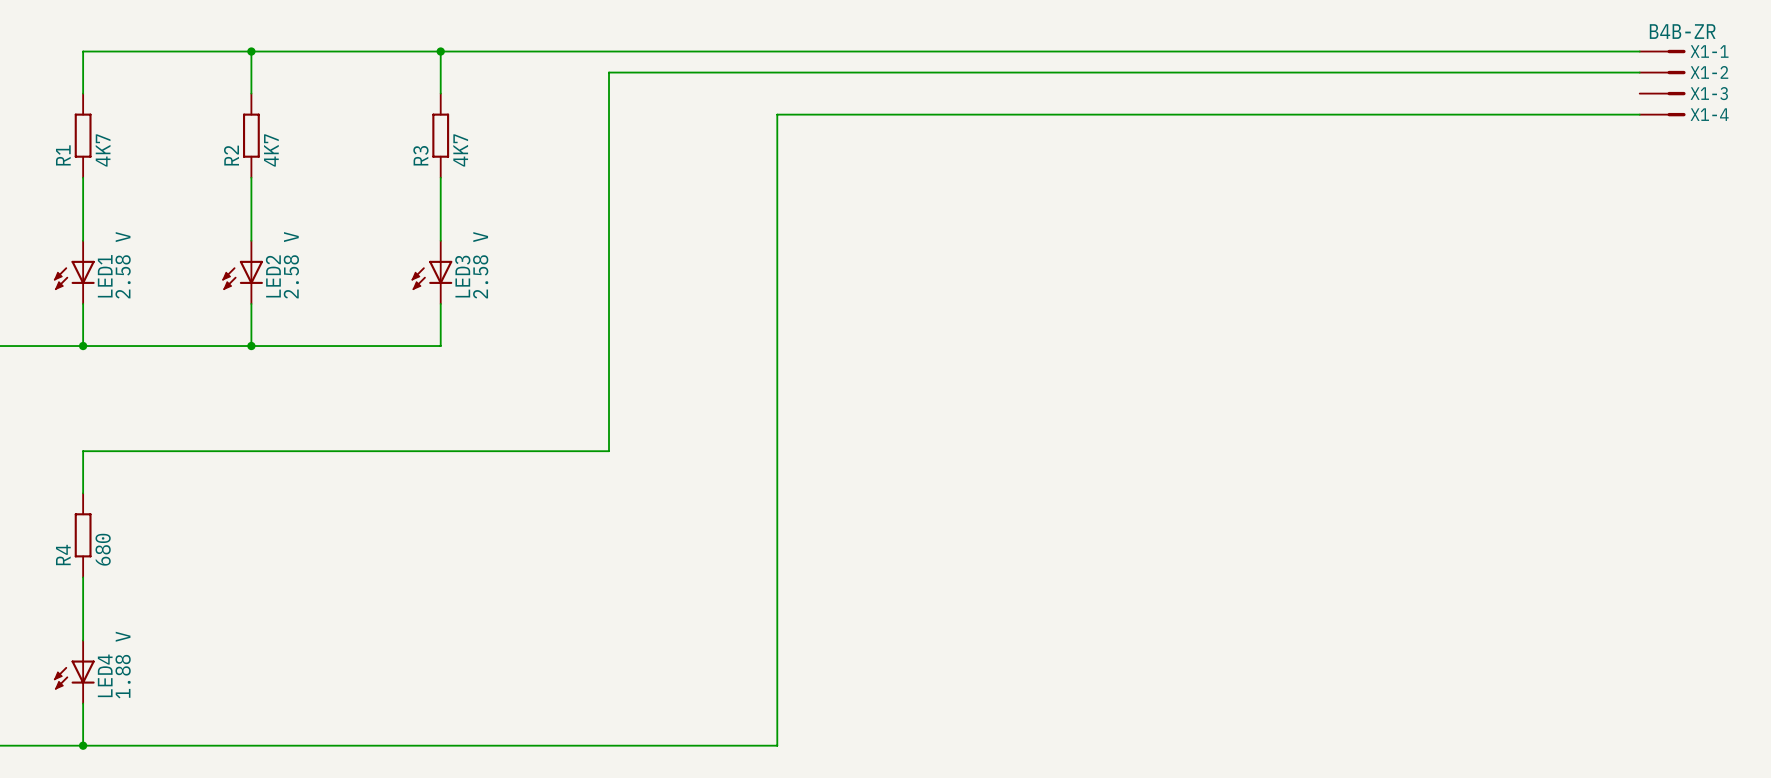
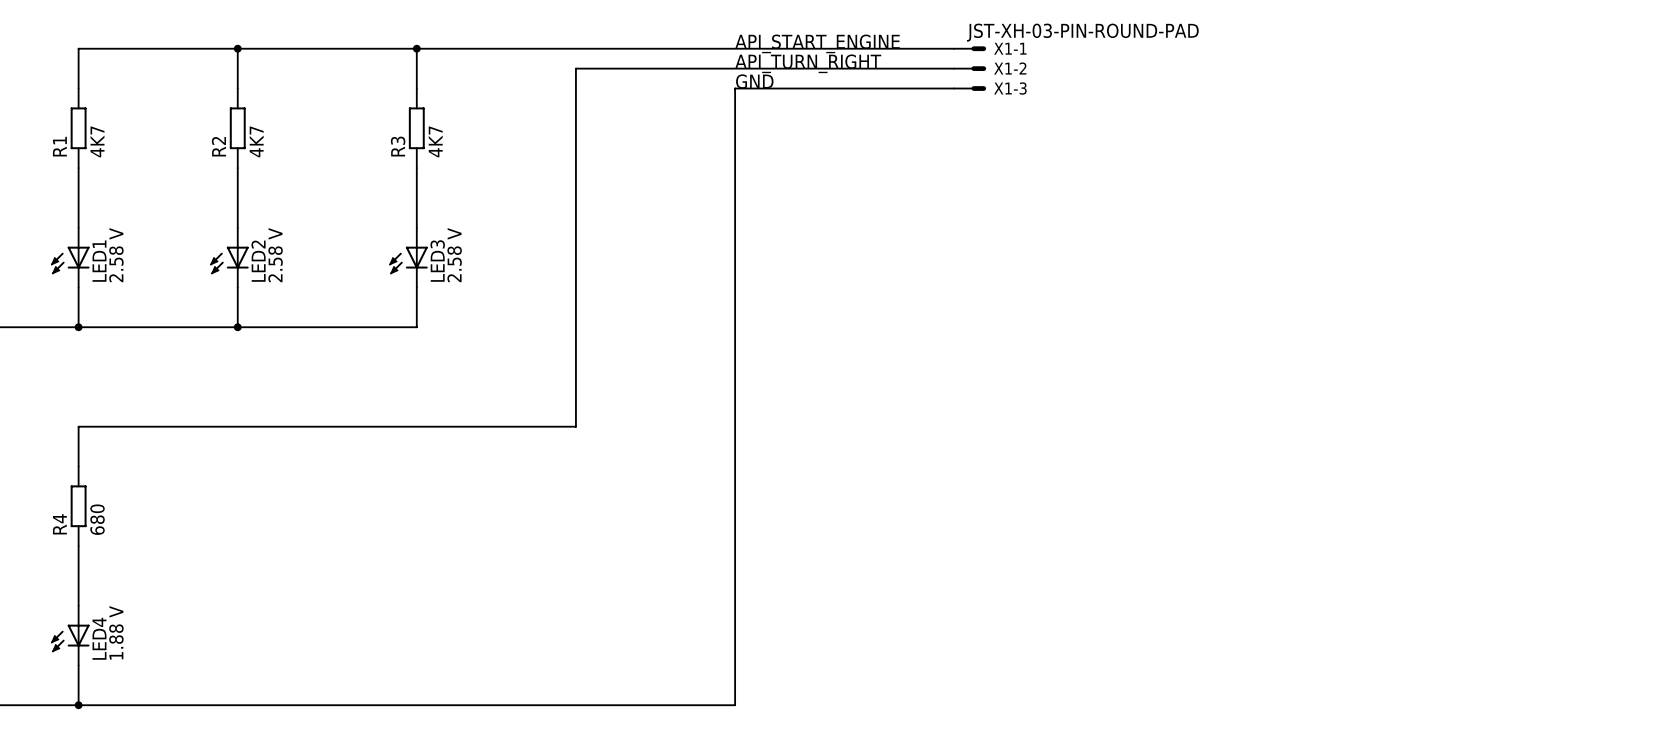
X1-1 value: B4B-ZR (1682, 31) -> JST-XH-03-PIN-ROUND-PAD (1082, 32)
label: none -> API_START_ENGINE (817, 43)
X1-1 symbol: [1639, 49, 1686, 54] -> [953, 46, 987, 52]
wire: (1008, 51) (1639, 51) -> none
label: none -> API_TURN_RIGHT (808, 63)
X1-2 symbol: [1639, 70, 1686, 75] -> [953, 66, 987, 72]
wire: (1008, 72) (1639, 72) -> none
label: none -> GND (754, 81)
X1-3 symbol: [1639, 91, 1686, 96] -> [953, 86, 987, 91]
wire: (777, 114) (1639, 114) -> (735, 108) (735, 88) (953, 88)
X1-4: (1662, 114) -> none

